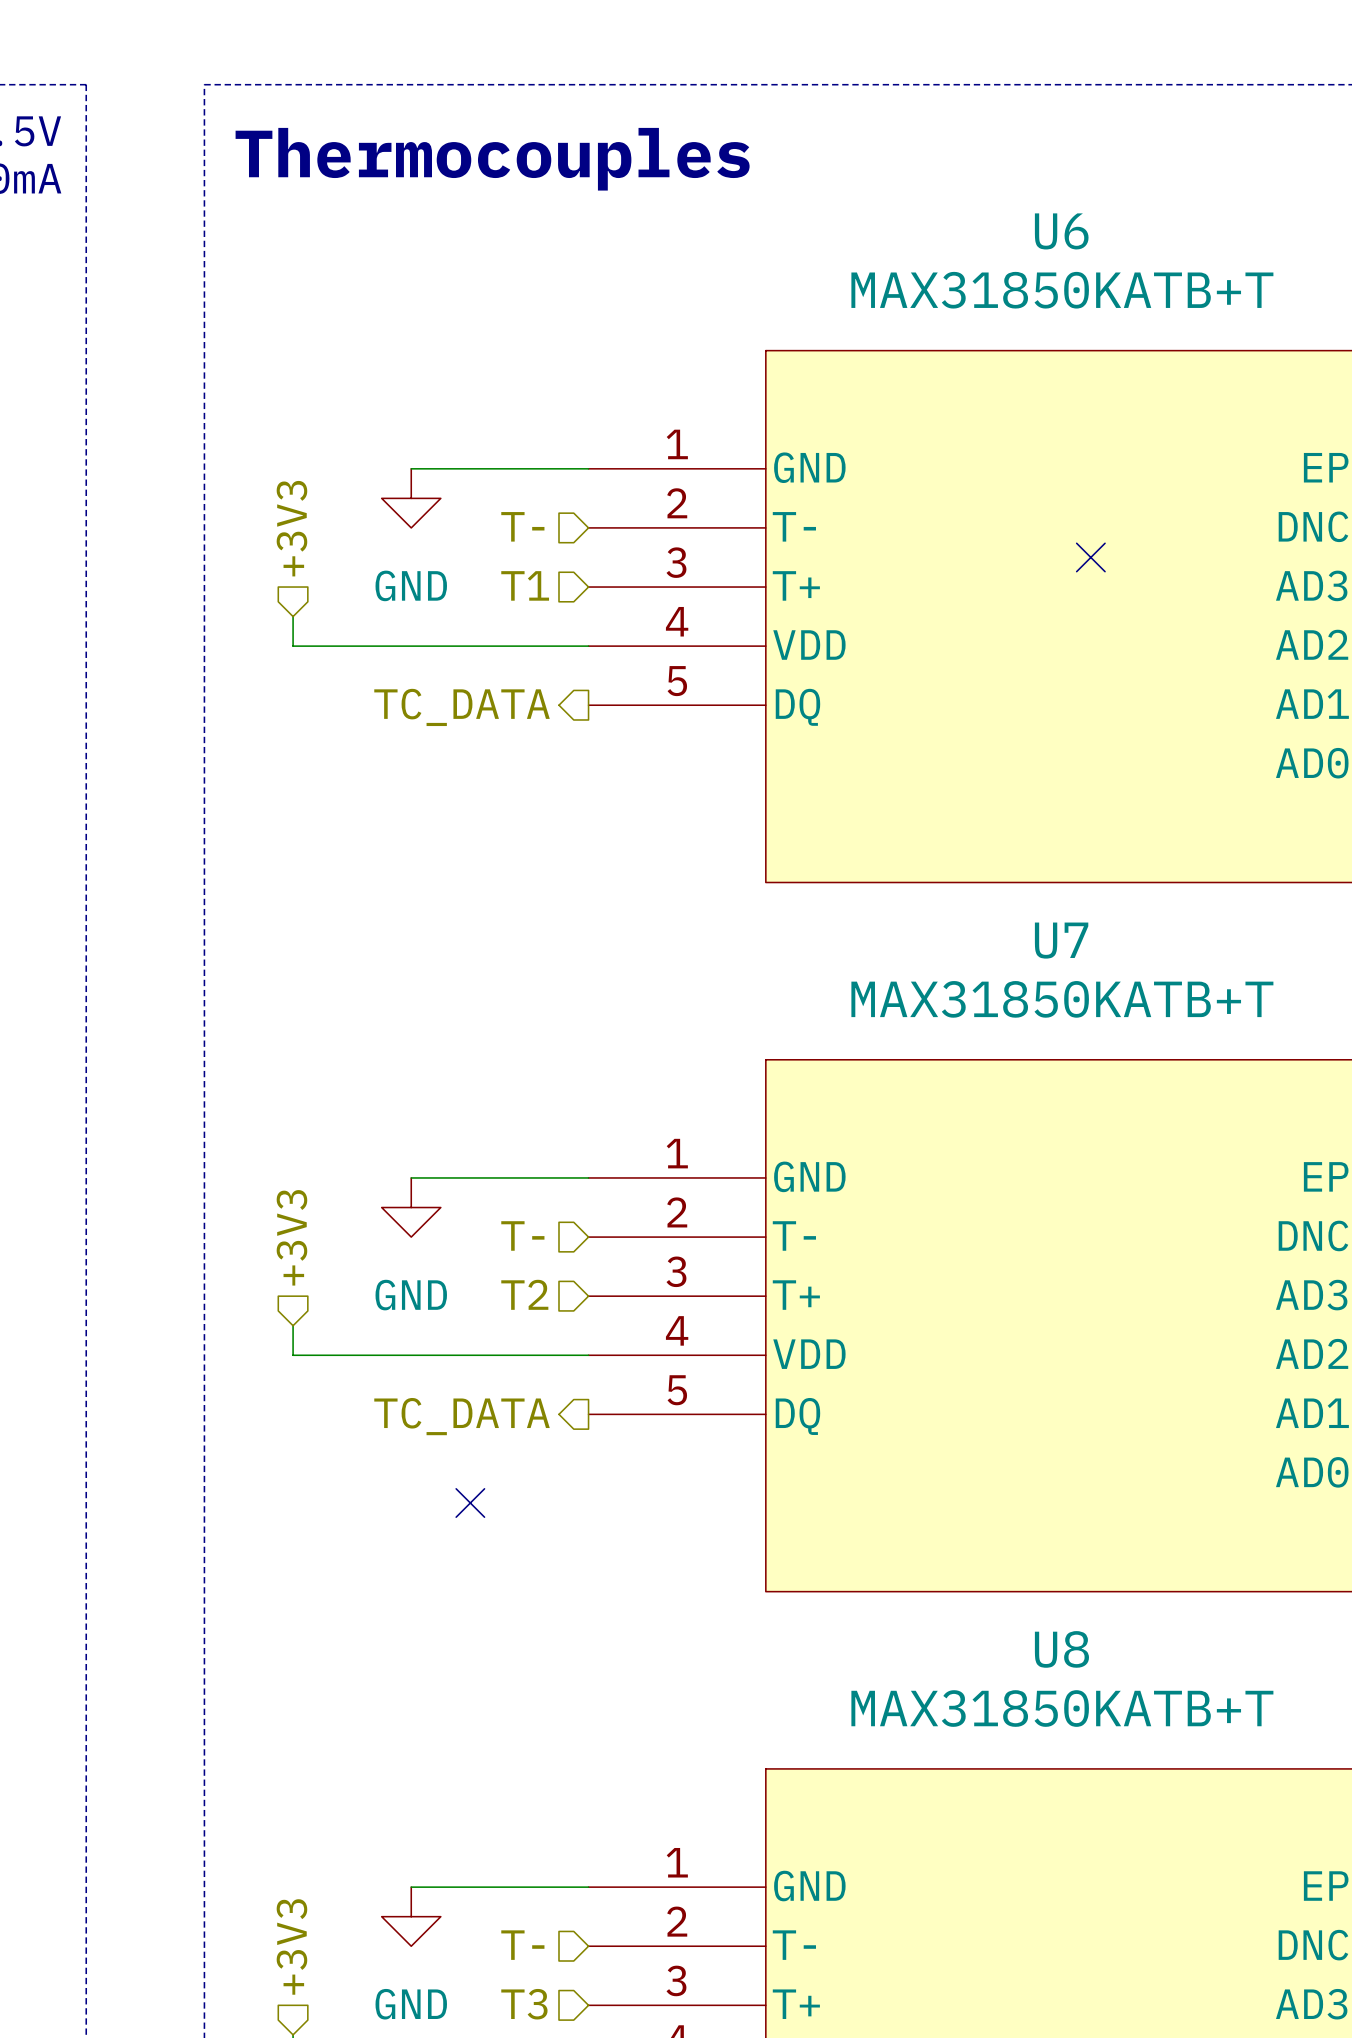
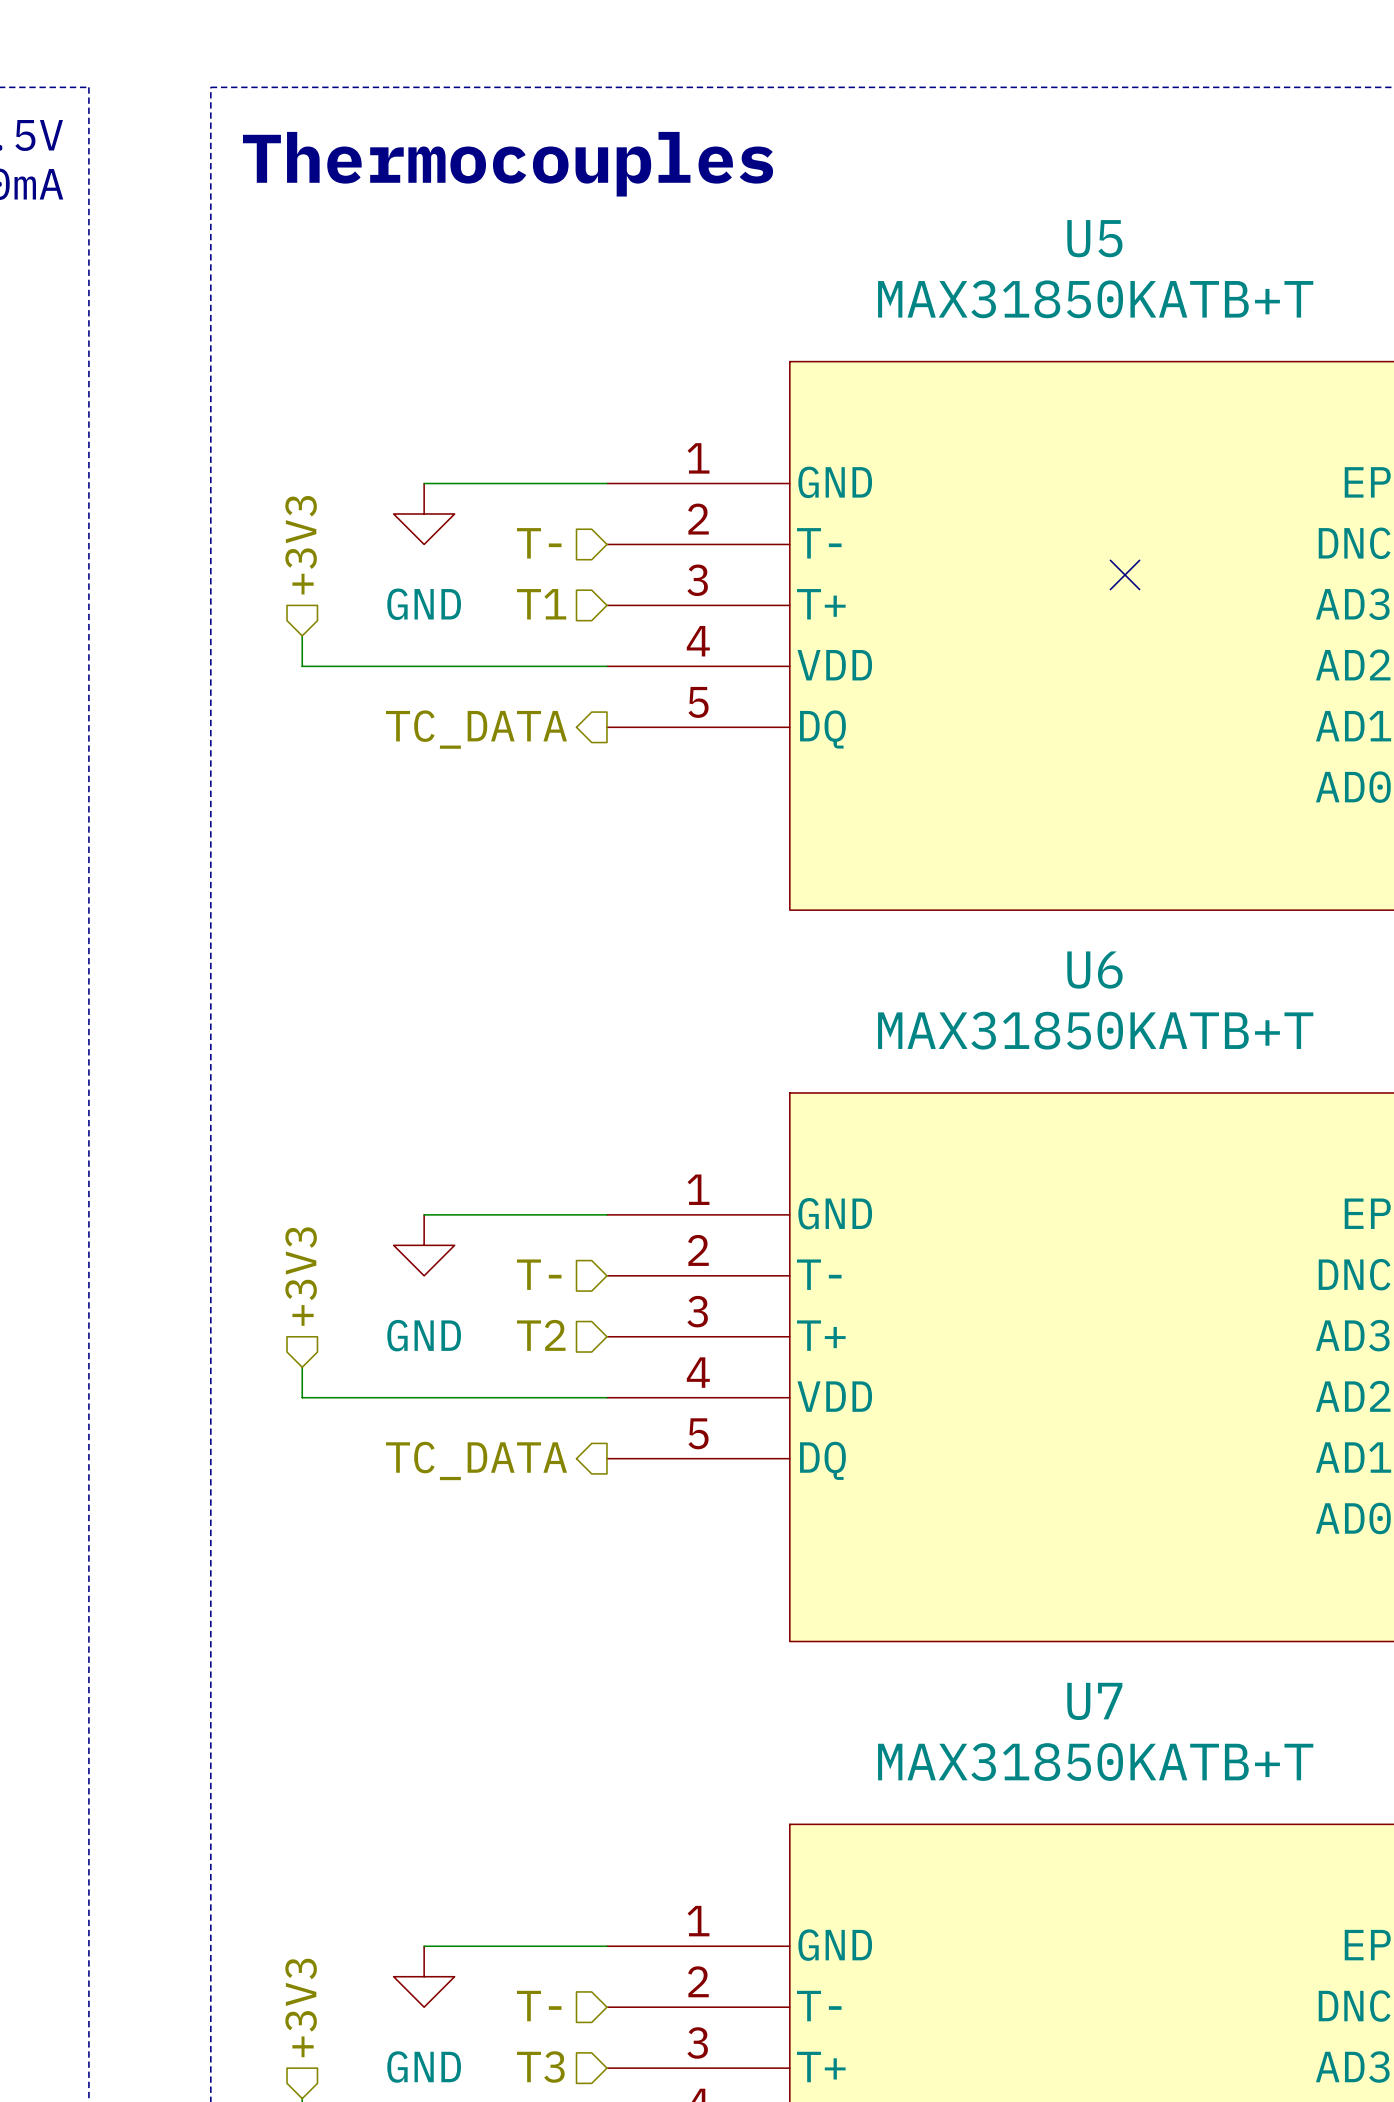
U6 name: U6 (1061, 231) -> U5 (1094, 238)
U7 name: U7 (1061, 940) -> U6 (1094, 970)
no-connect mark: (470, 1503) -> none
U8 name: U8 (1061, 1649) -> U7 (1094, 1701)

